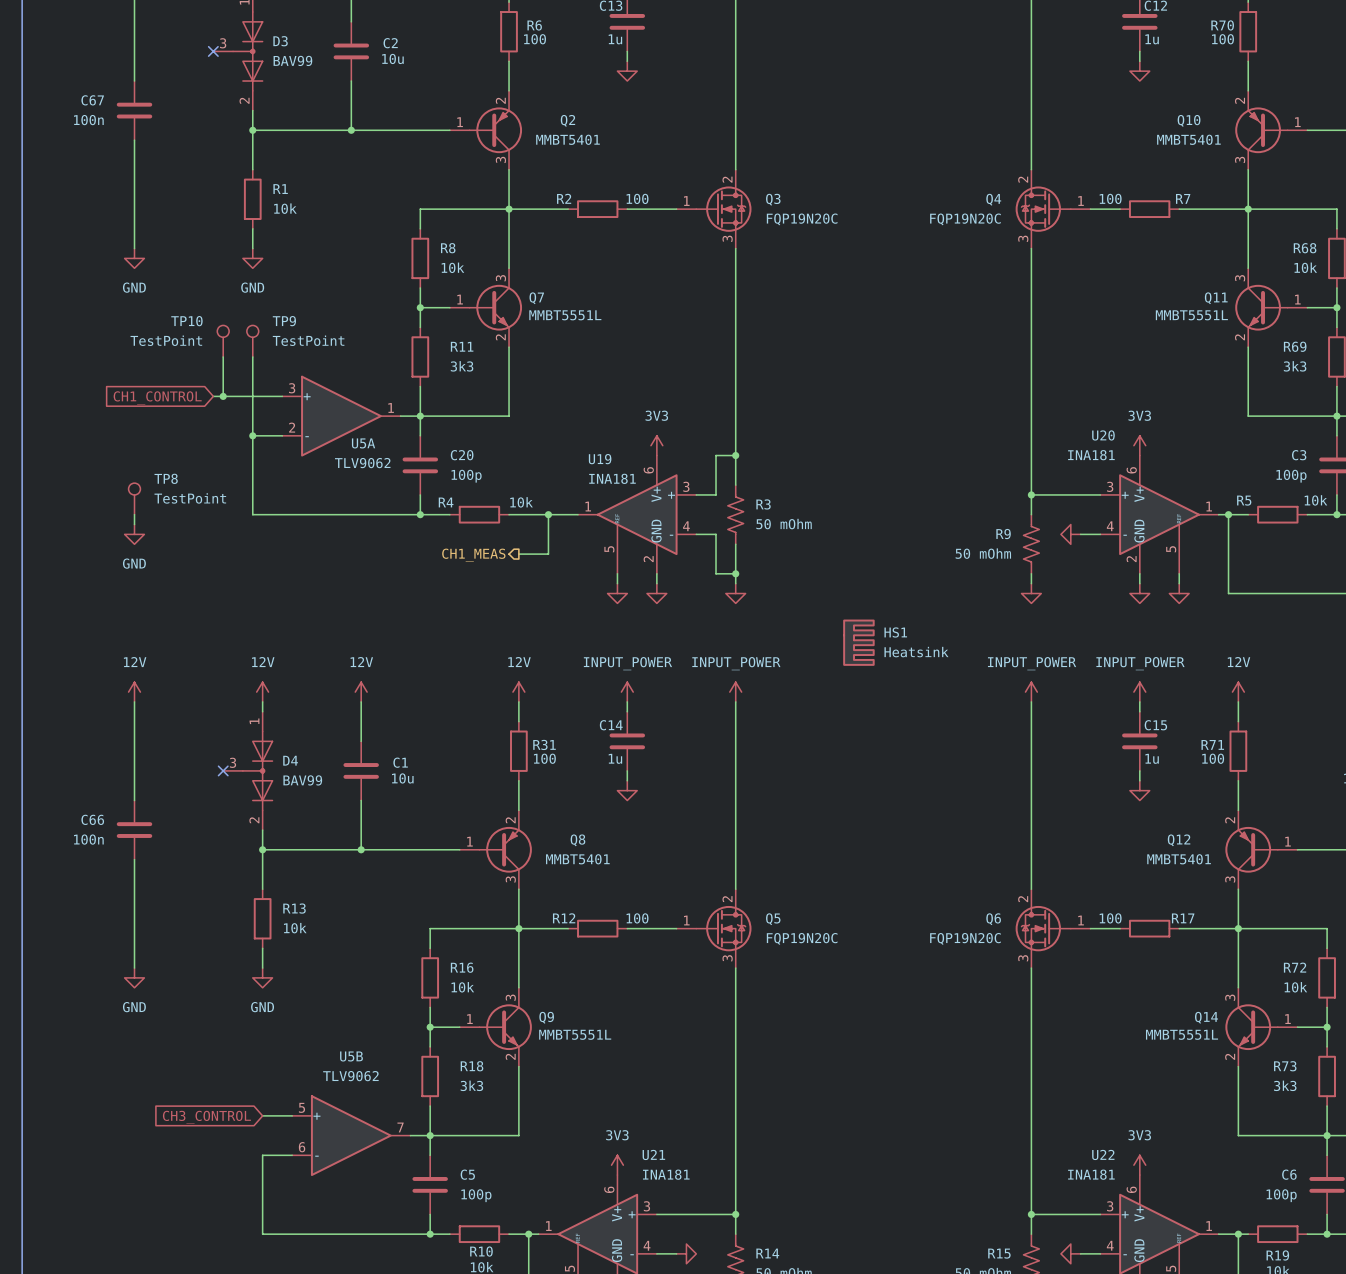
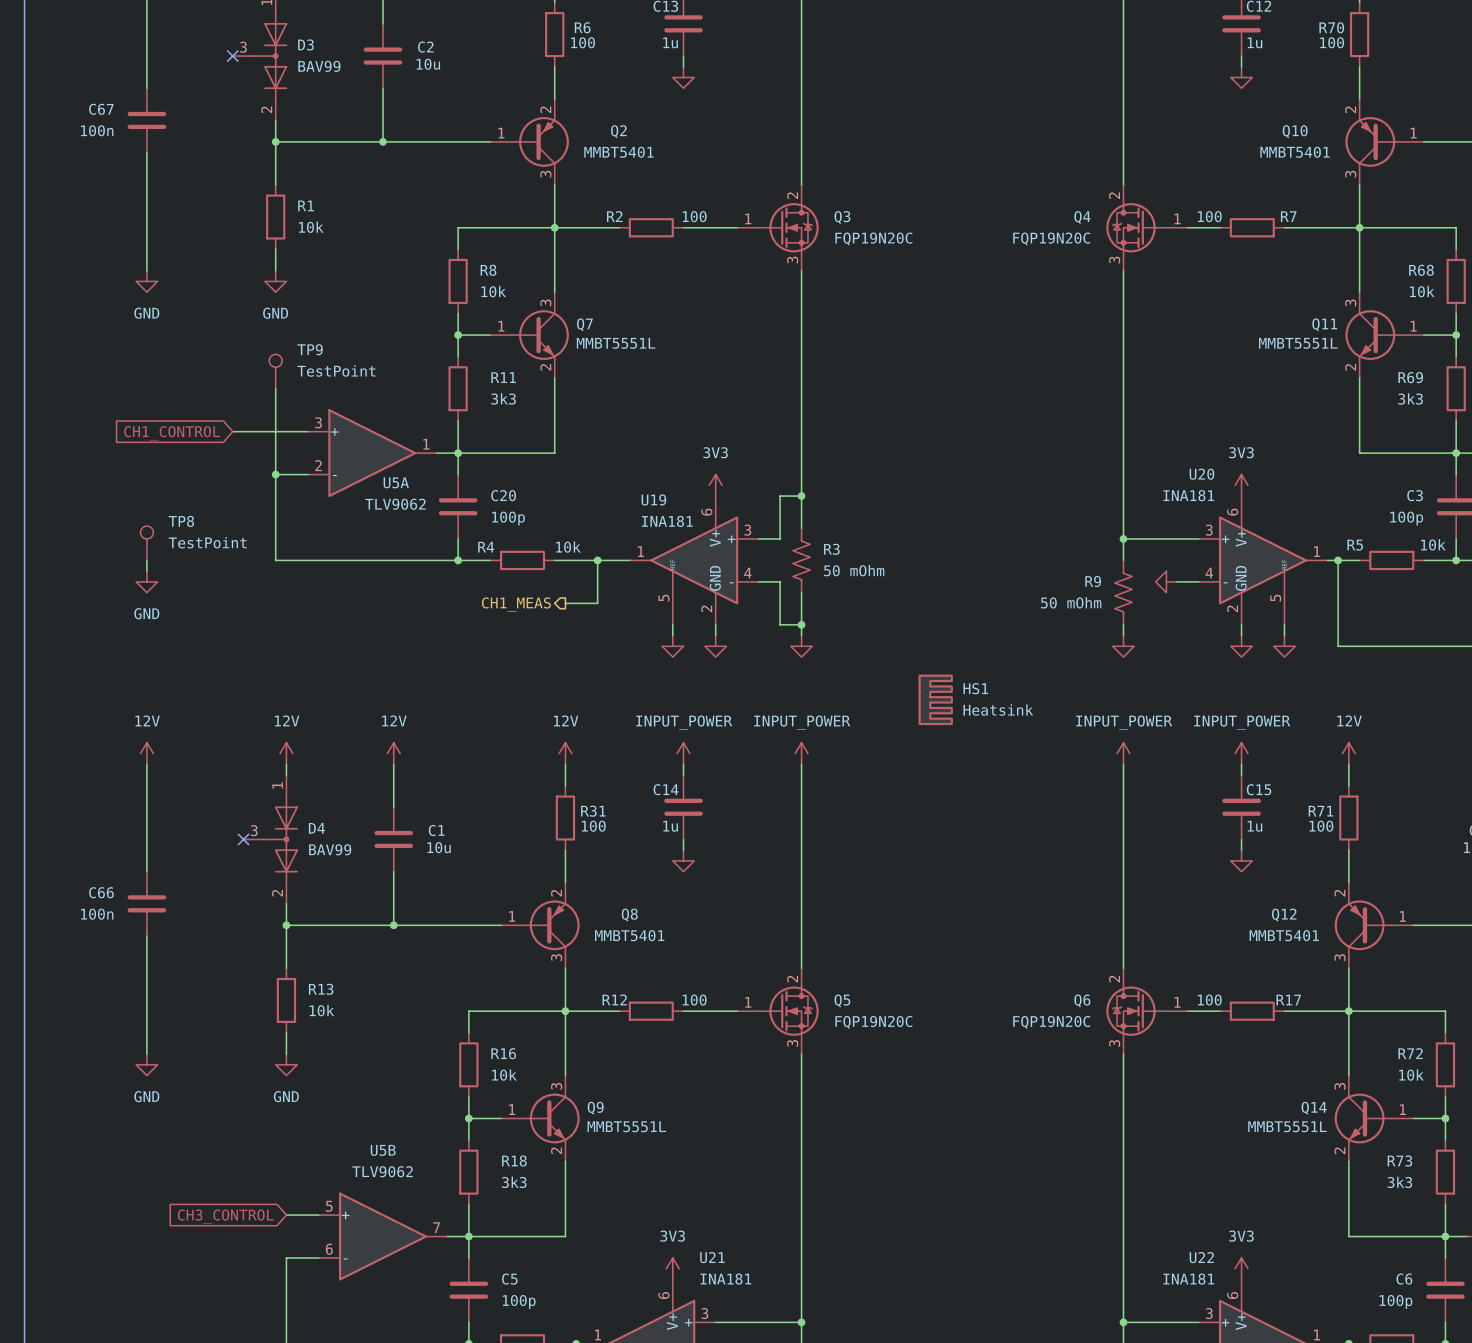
TP10: TestPoint (223, 341) -> none
wire: (223, 356) (223, 396) -> none
junction: (223, 396) -> none

